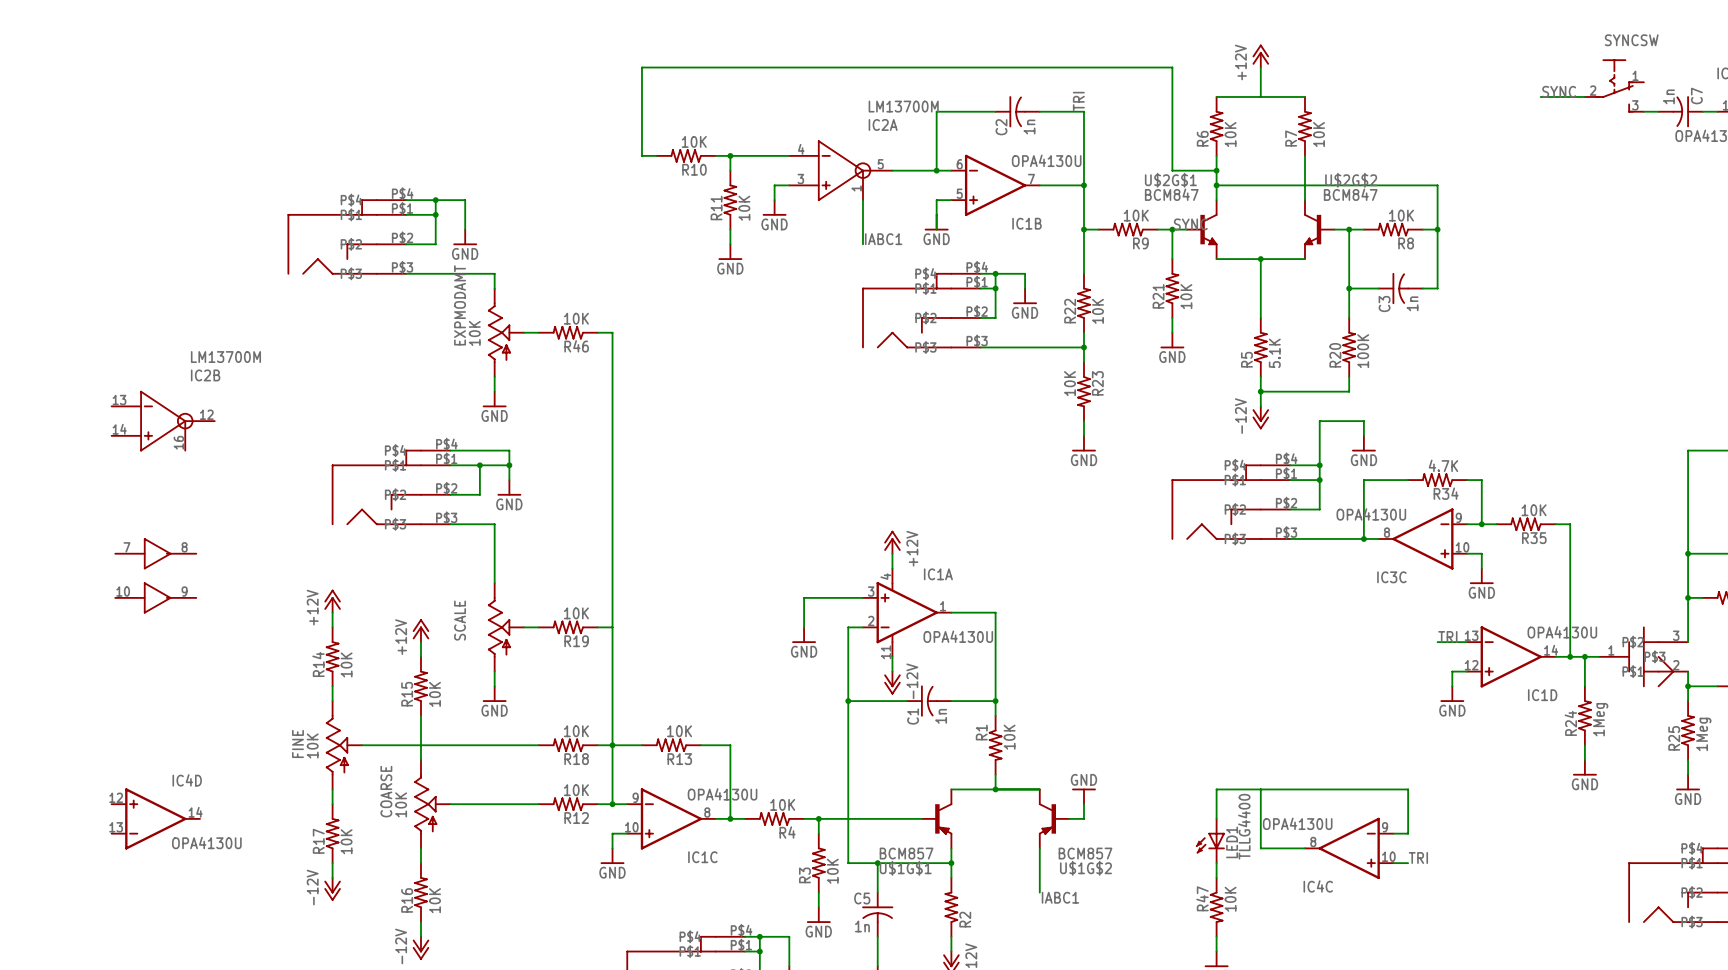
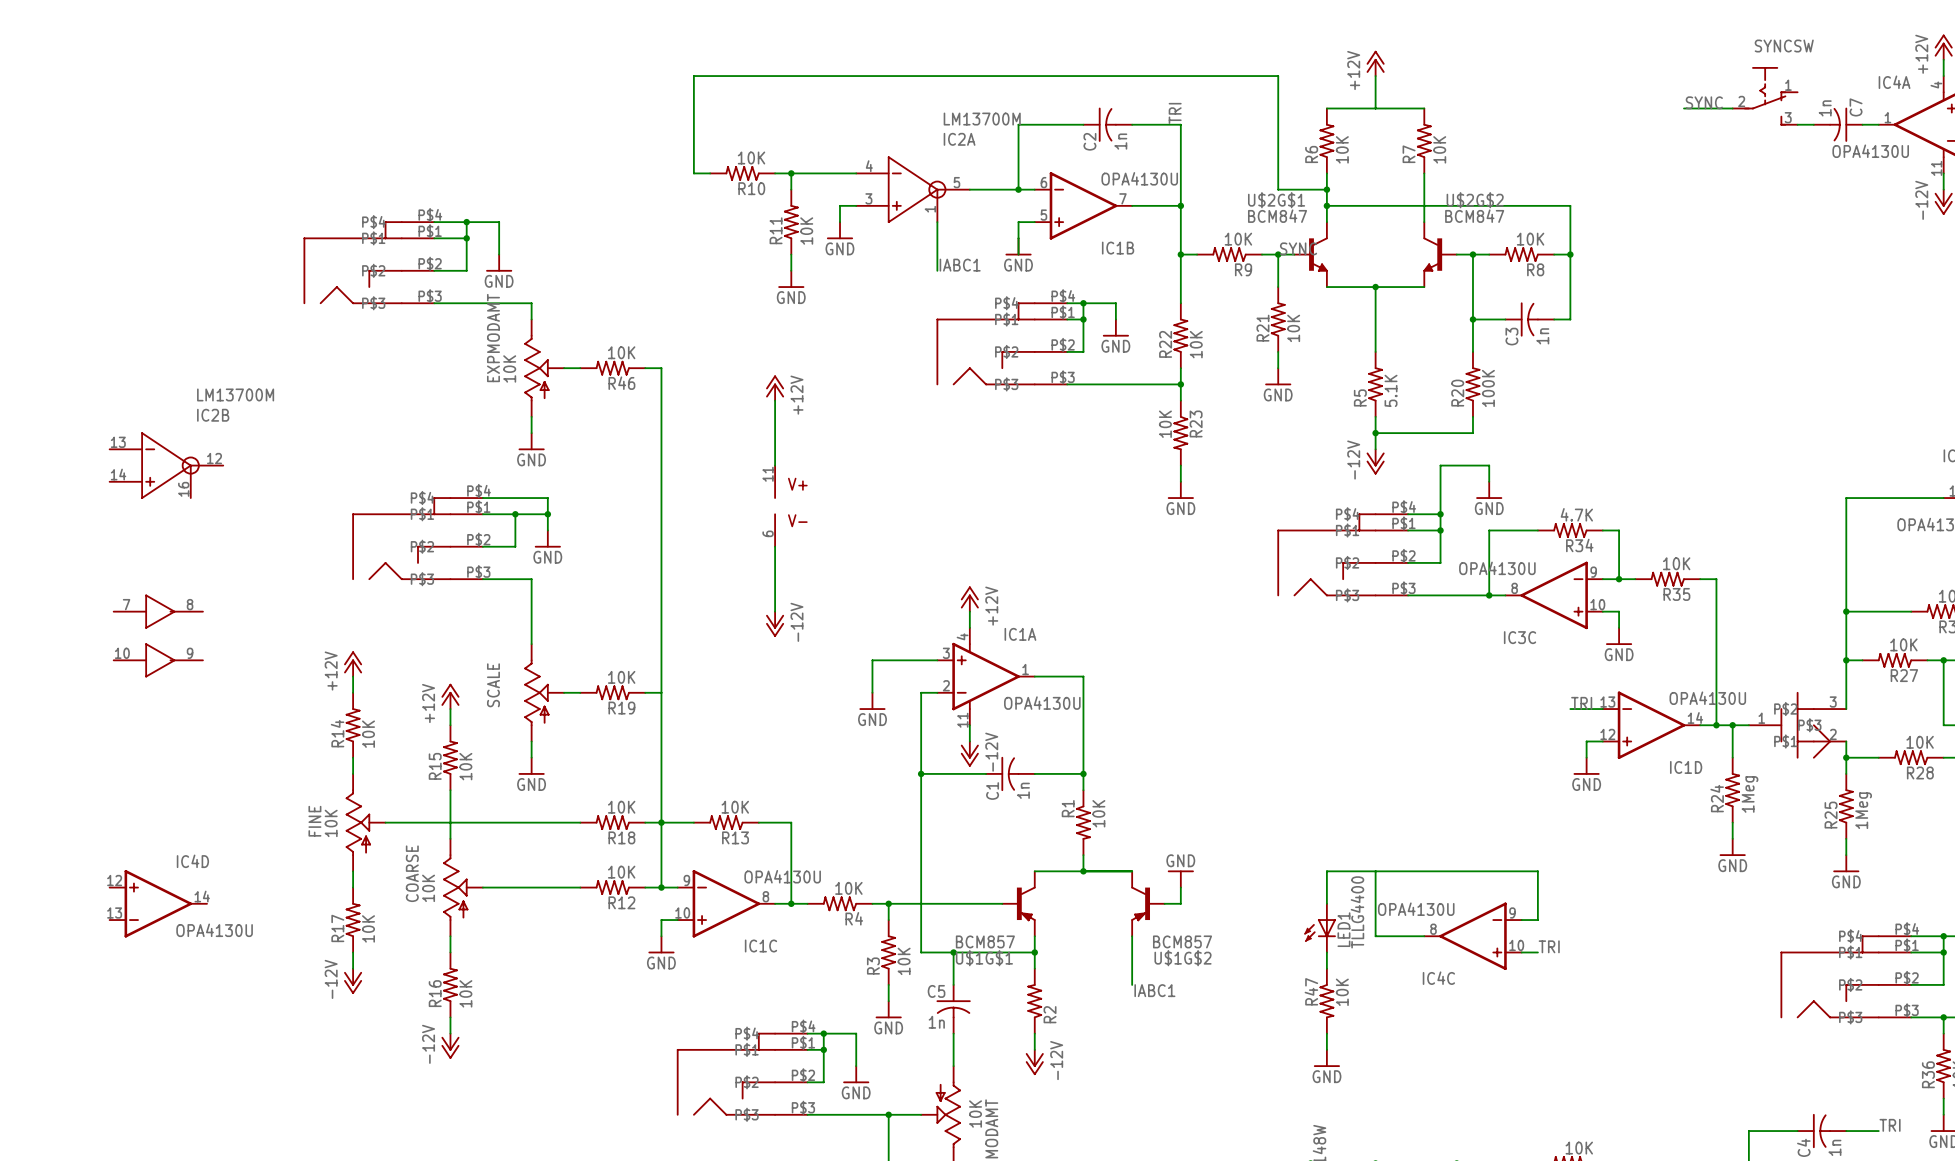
power symbol: none -> +12V (775, 388)
wire: none -> (775, 400) (775, 465)
part: none -> (775, 506)
wire: none -> (775, 546) (775, 611)
power symbol: none -> -12V (775, 624)

